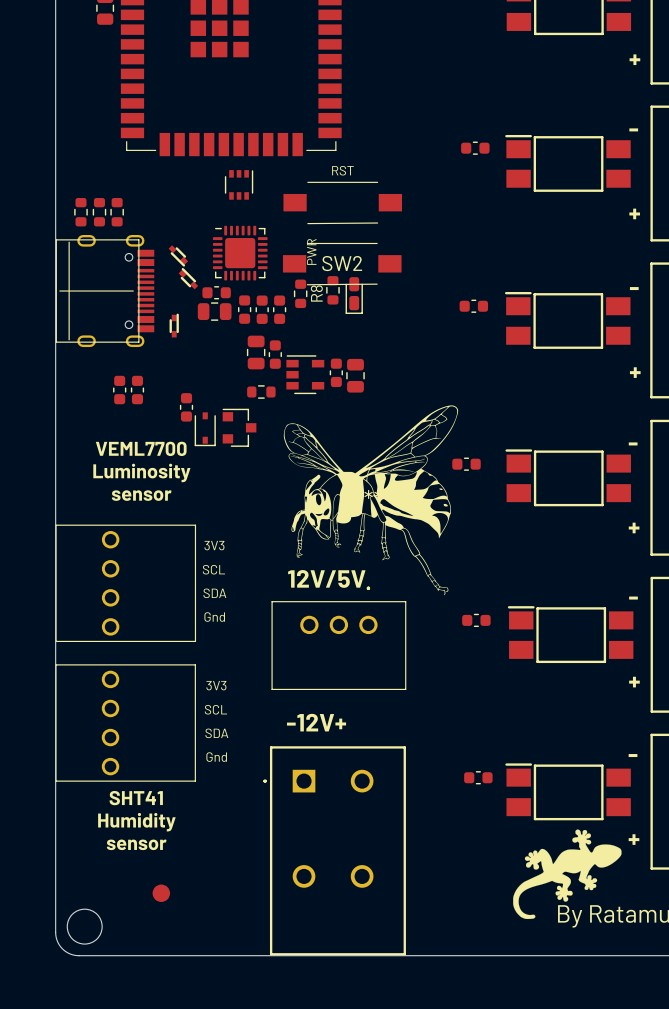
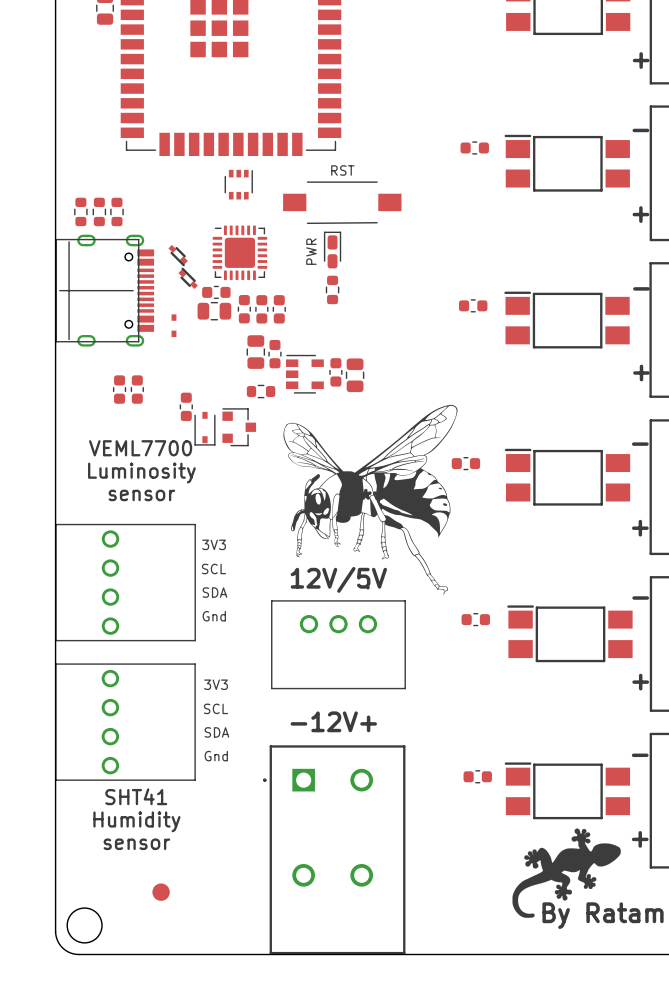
SW2: (342, 264) -> none
R8: (300, 293) -> none
part rotation: 0° (354, 295) -> 180° (332, 250)
part position: (354, 295) -> (332, 250)
part footprint: [169, 313, 179, 338] -> [171, 314, 177, 338]

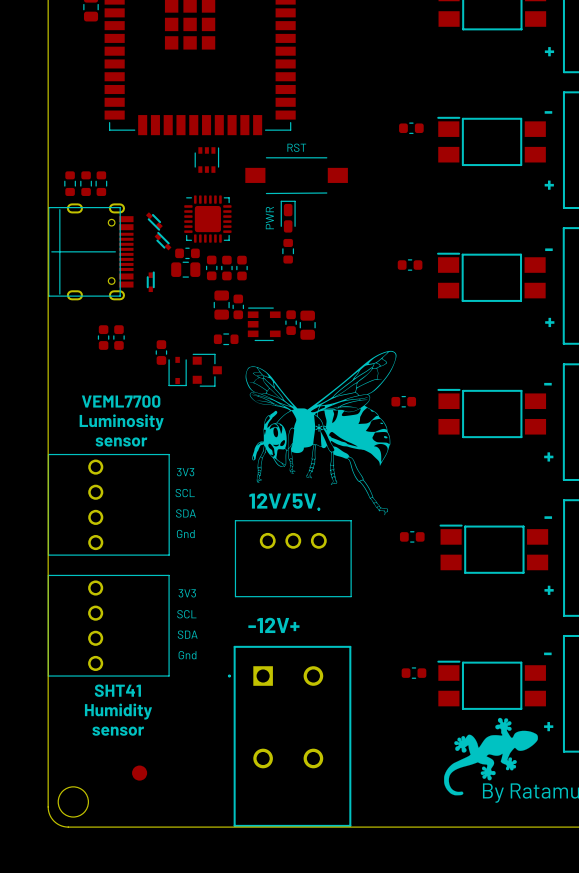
part footprint: [171, 314, 177, 338] -> [146, 271, 155, 293]
text: VEML7700 (140, 448) -> none
text: Luminosity (141, 473) -> VEML7700 (121, 401)
text: sensor (141, 495) -> Luminosity (121, 422)
text: none -> sensor (121, 441)

